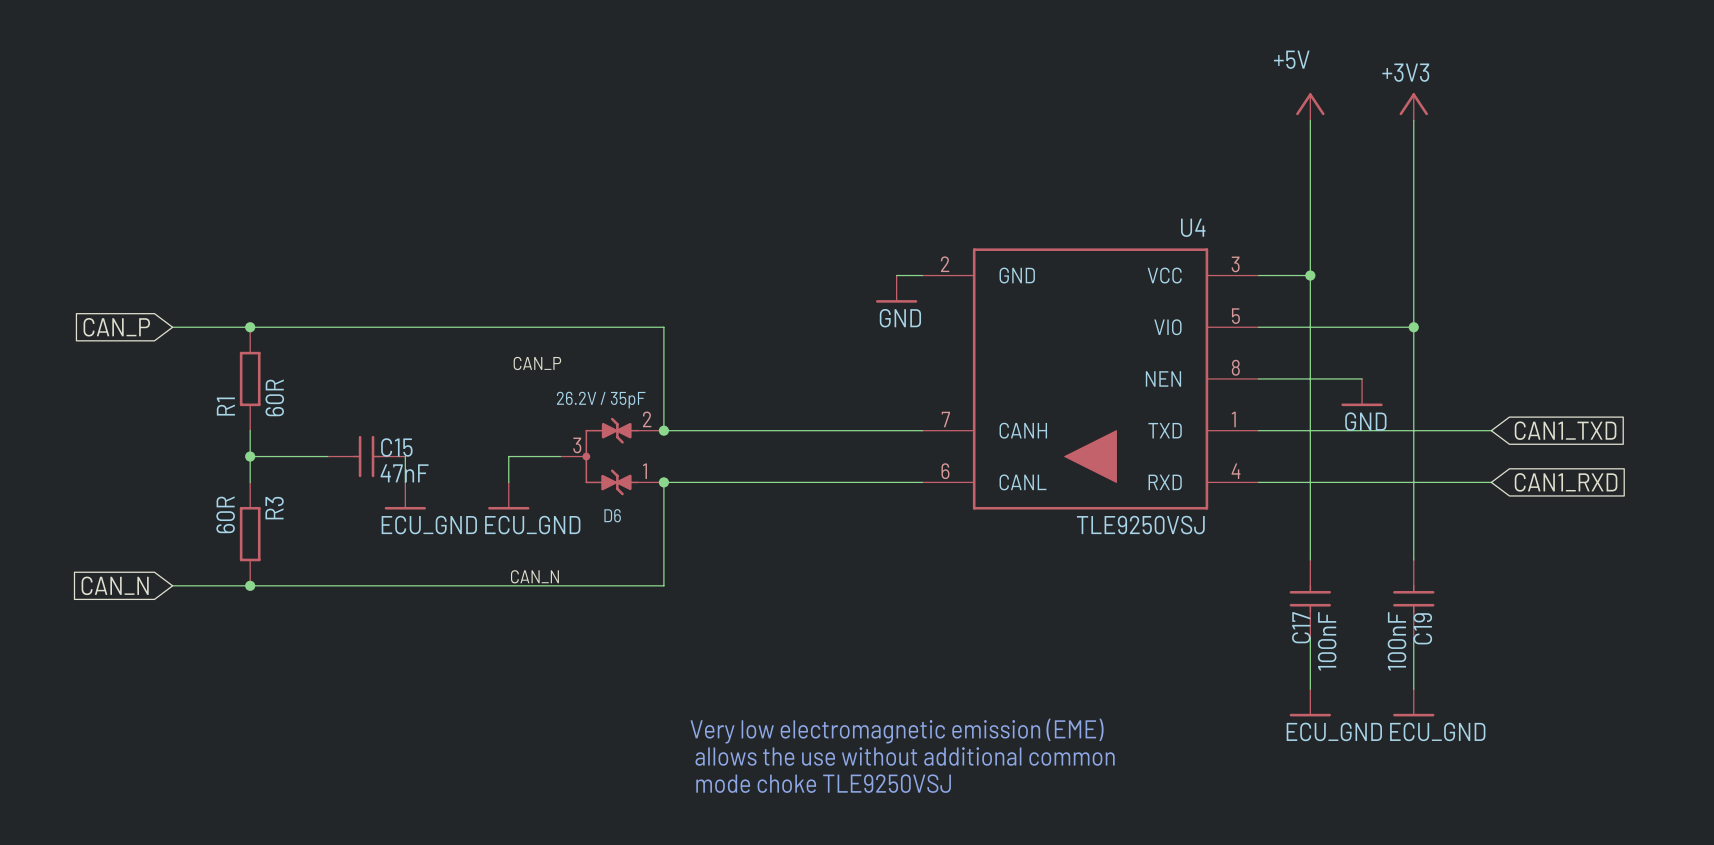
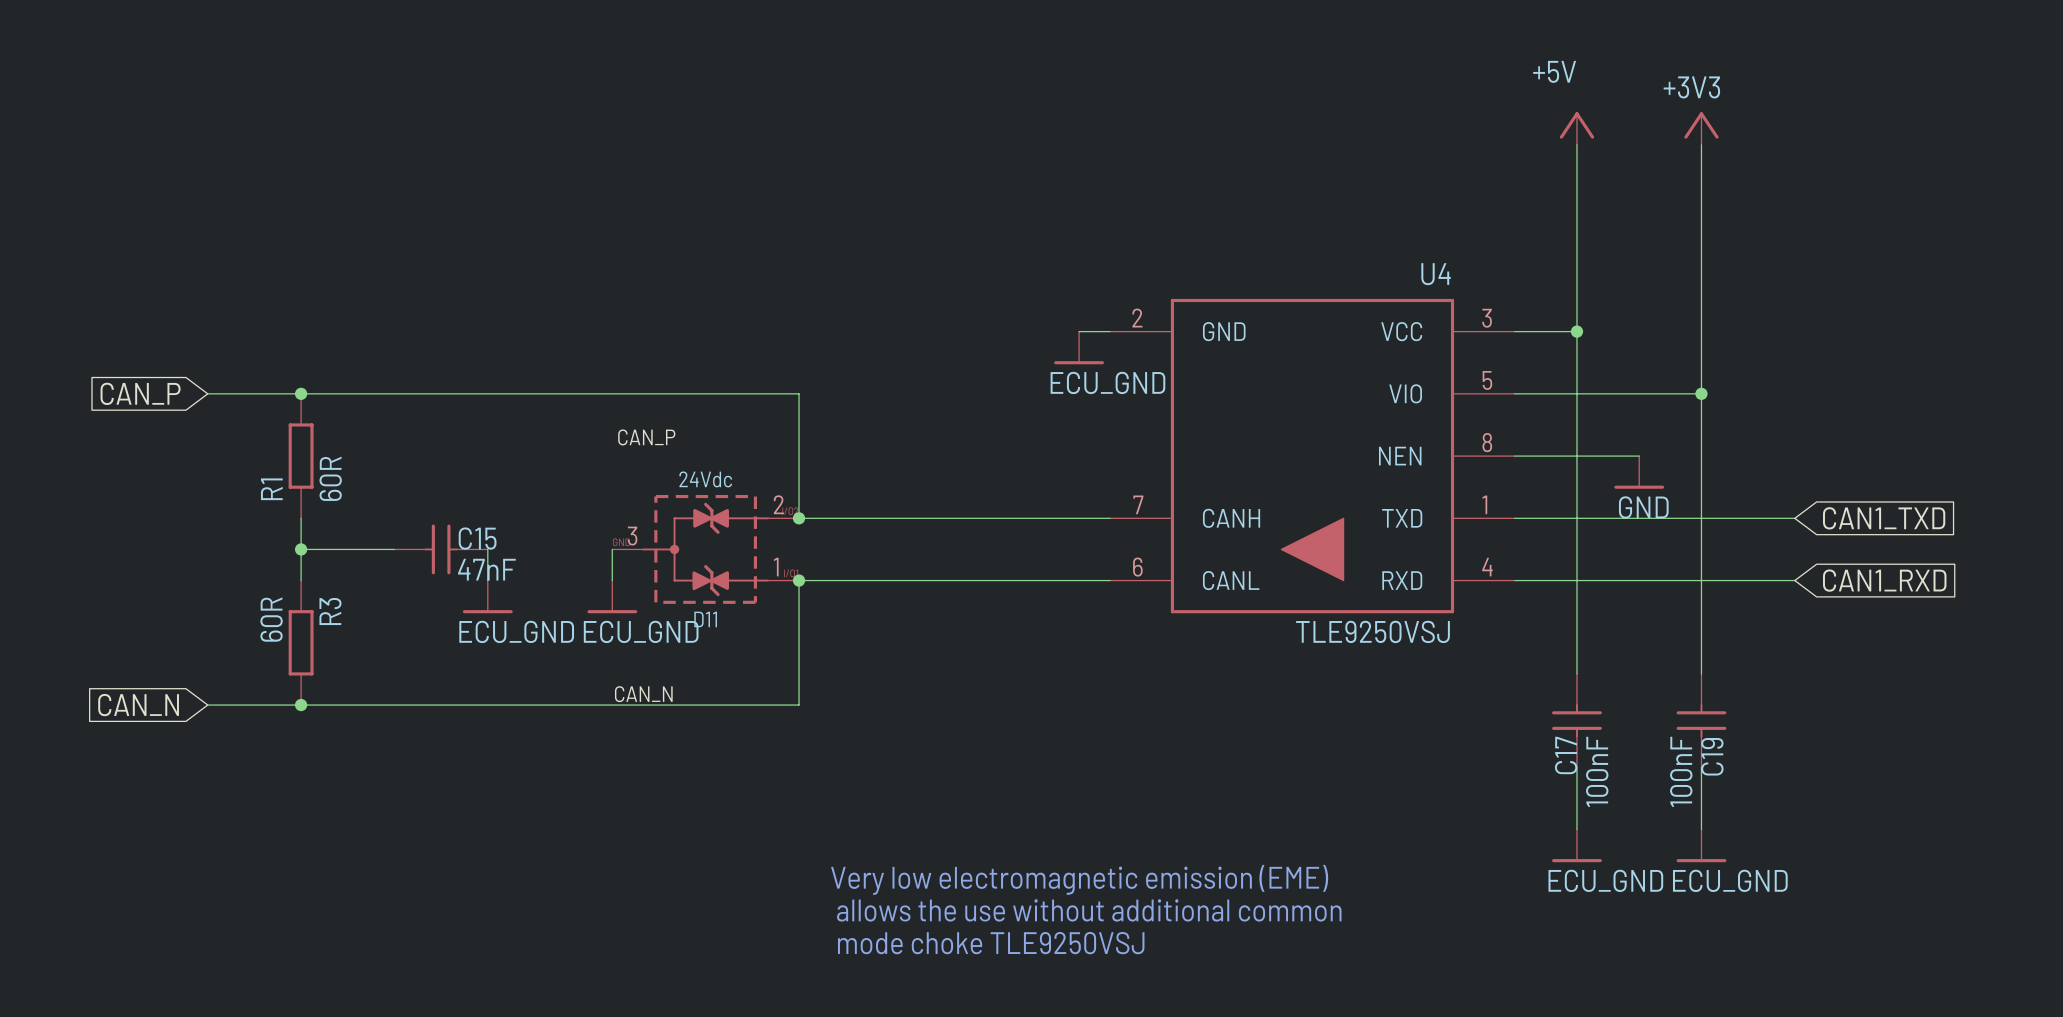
power symbol: GND (896, 289) -> ECU_GND (1079, 347)
D11: none -> 24Vdc (705, 549)
D6: 26.2V / 35pF (612, 456) -> none

